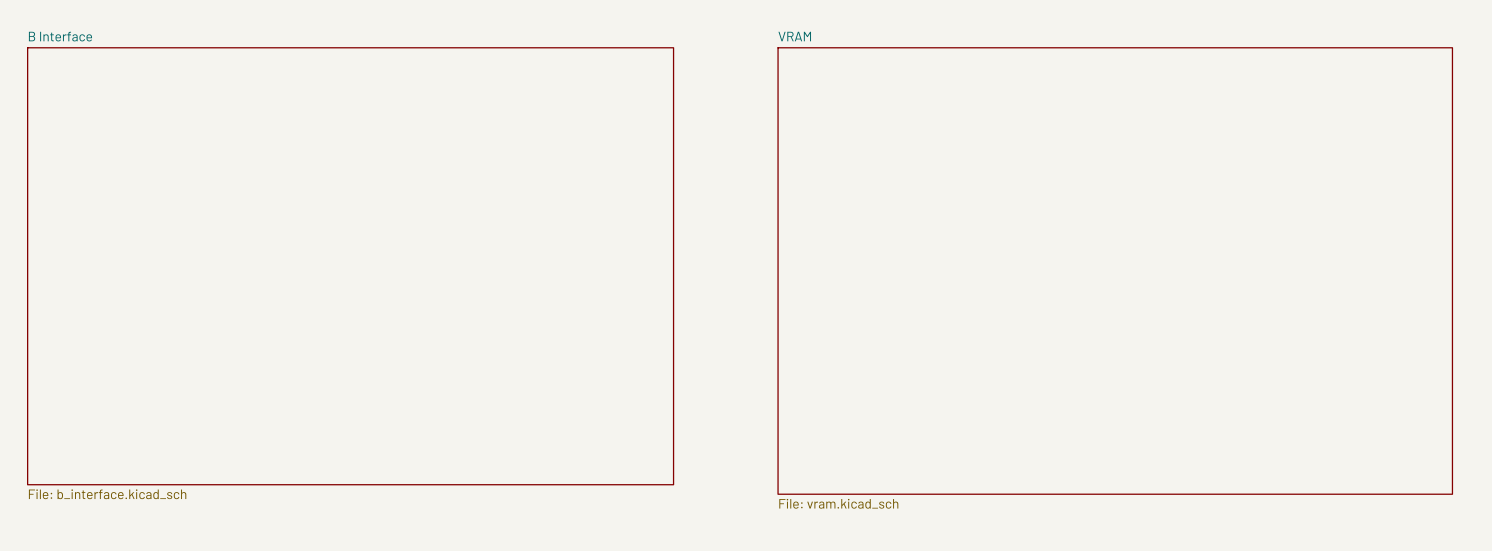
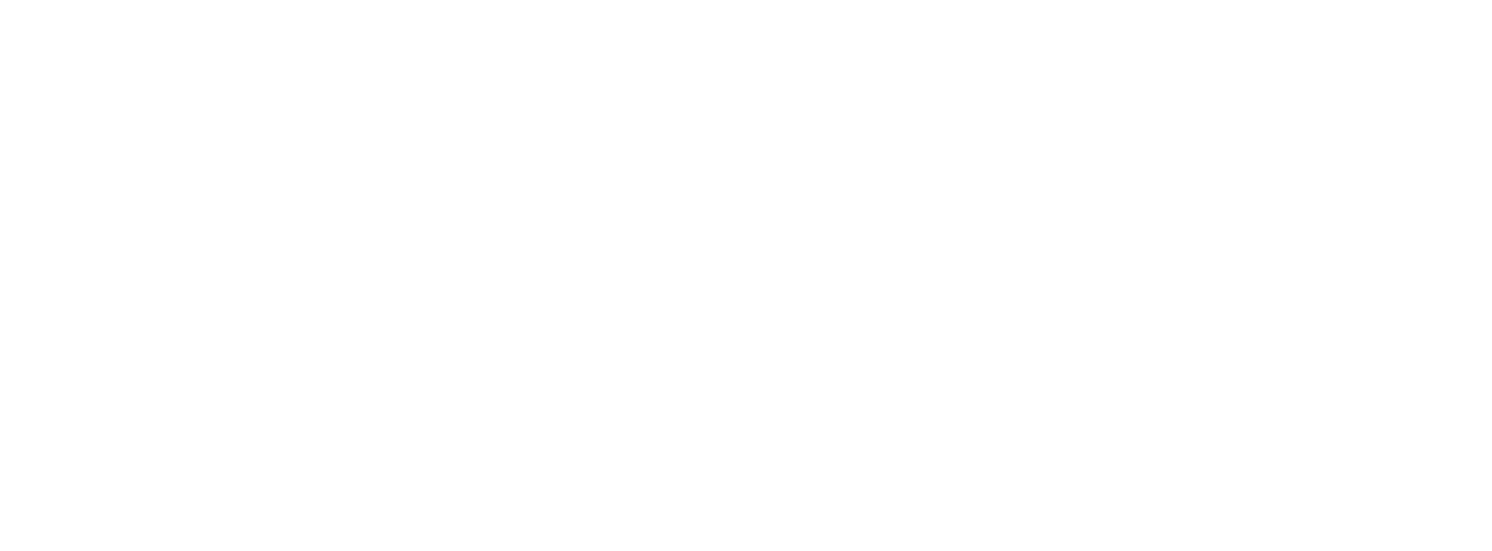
sheet B Interface: File: b_interface.kicad_sch (350, 266) -> none
sheet VRAM: File: vram.kicad_sch (1115, 271) -> none

